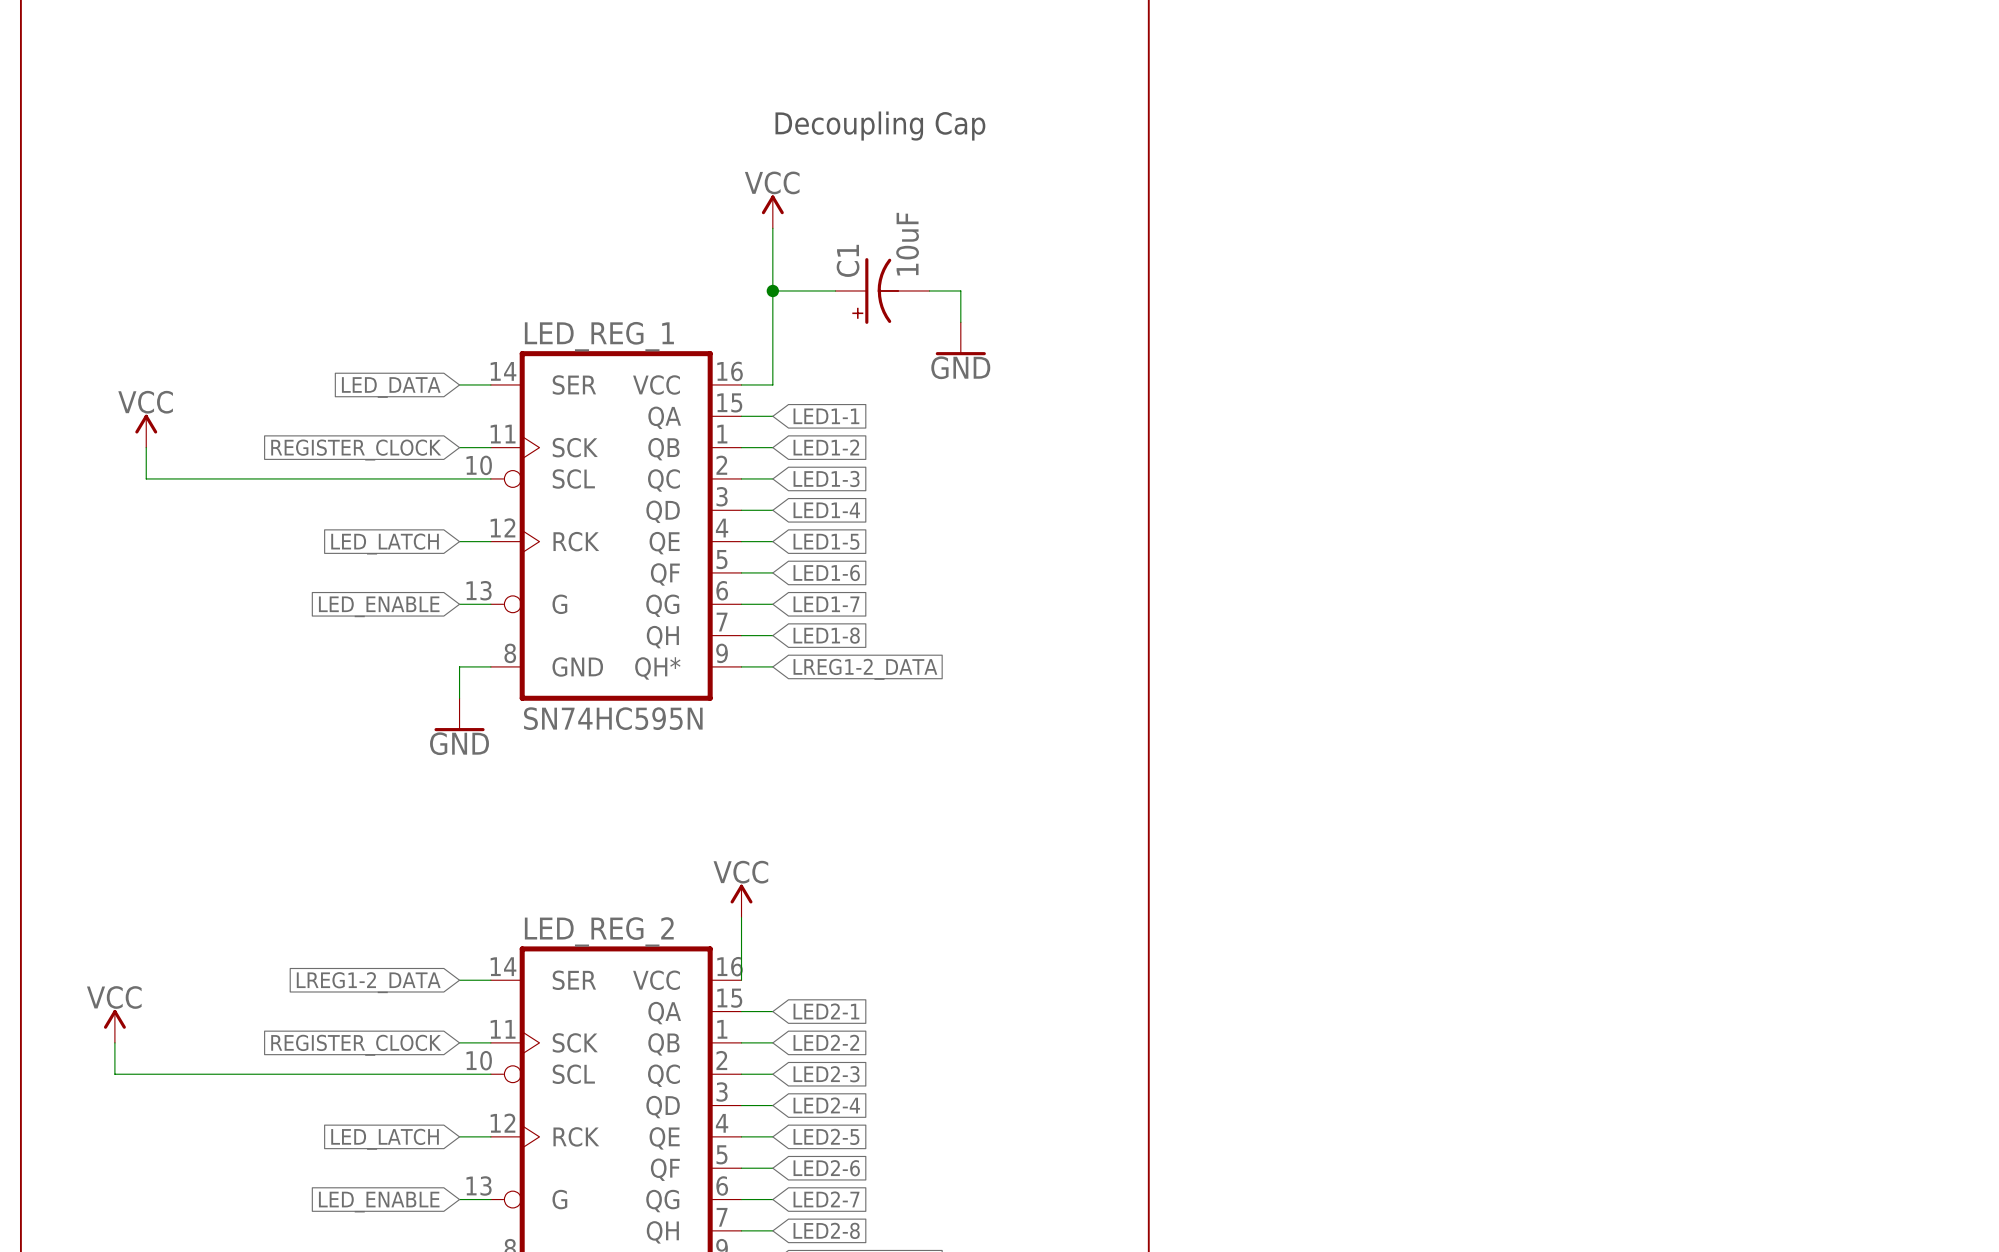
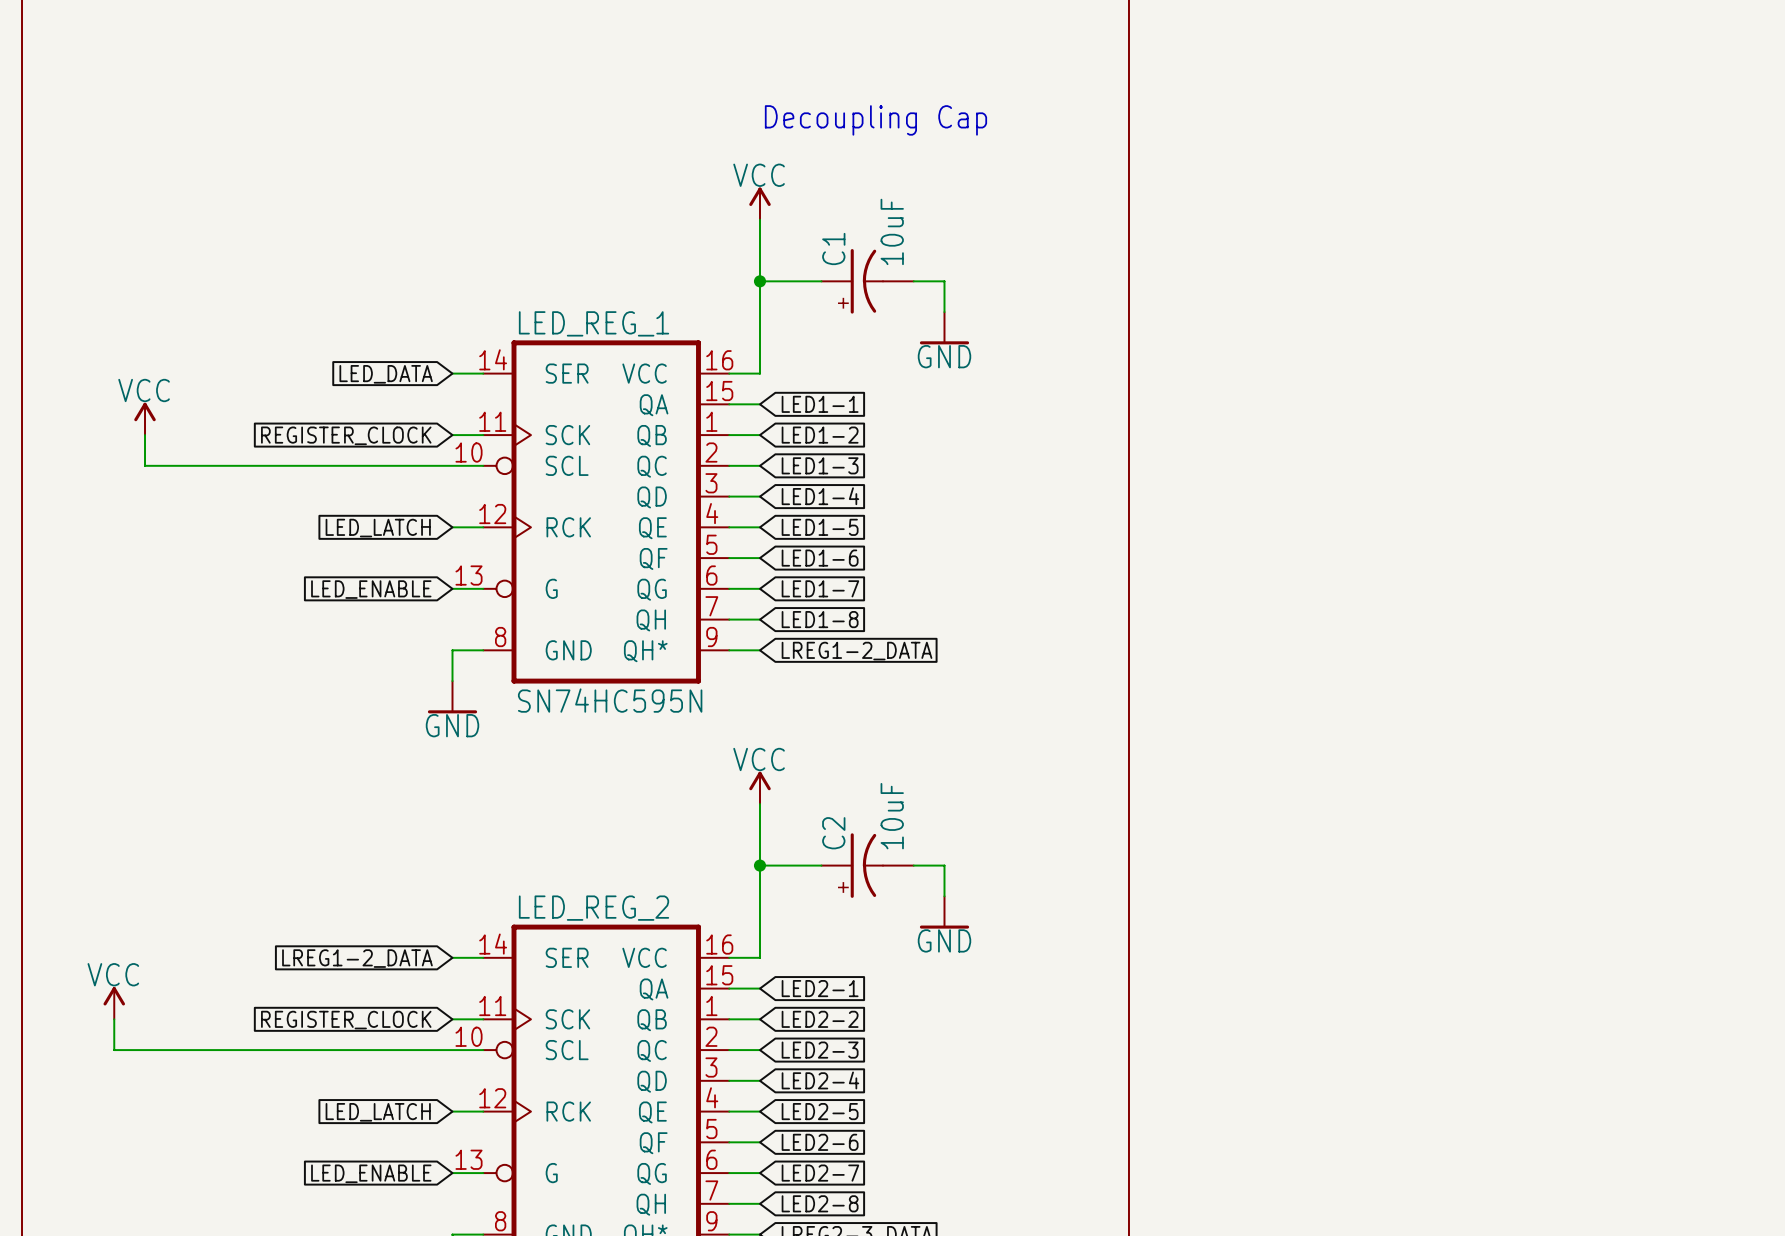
wire: none -> (759, 865) (821, 865)
junction: none -> (759, 865)
C2: none -> 10uF (867, 865)
wire: none -> (913, 865) (944, 865) (944, 896)
power symbol position: VCC (741, 901) -> VCC (759, 787)
wire: (741, 917) (741, 980) -> (759, 804) (759, 957) (729, 957)
power symbol: none -> GND (944, 912)

